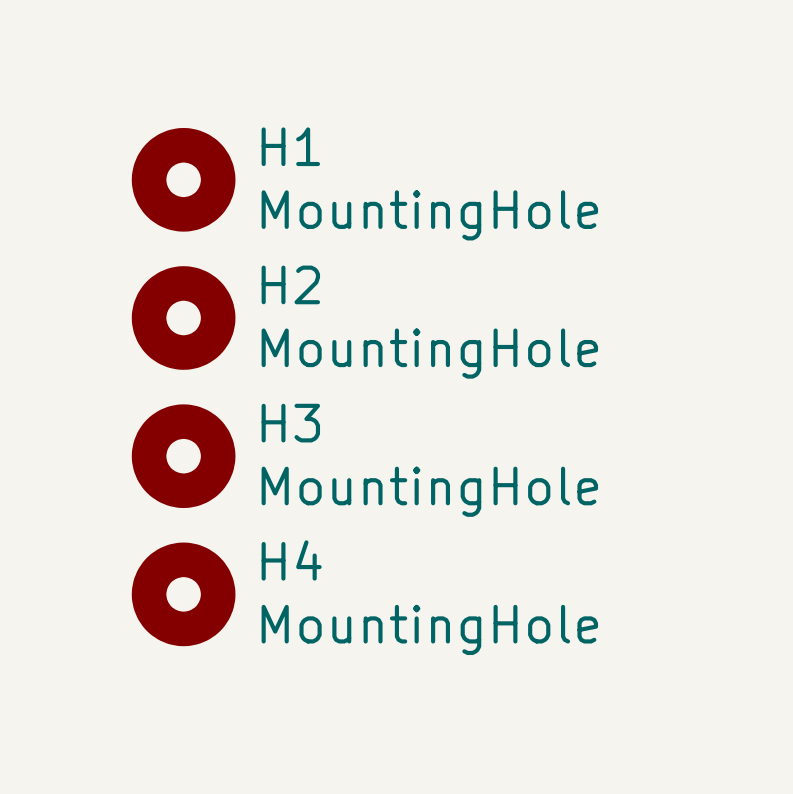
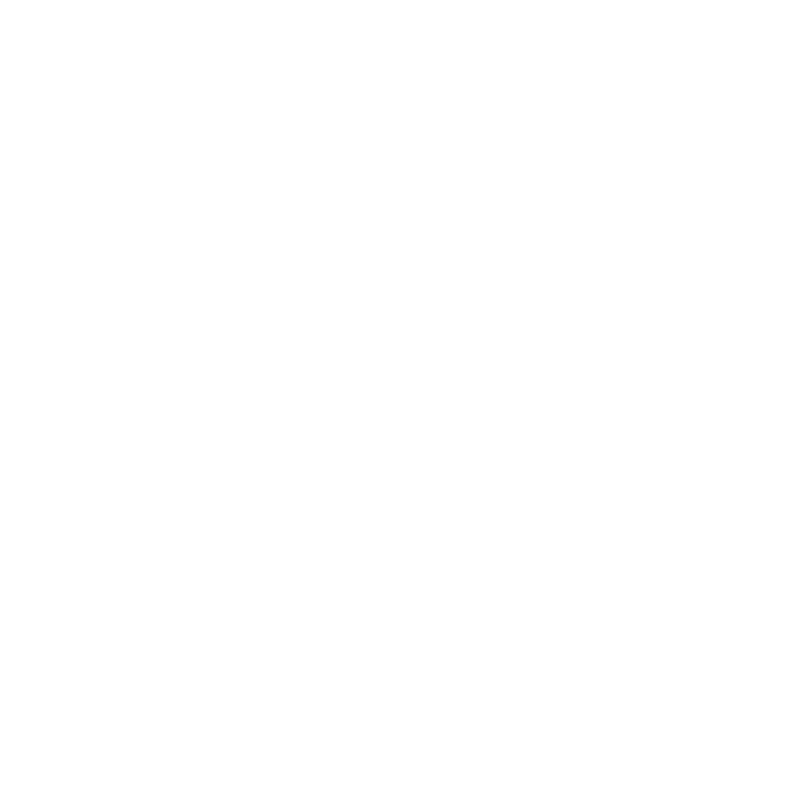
H1: MountingHole (183, 179) -> none
H2: MountingHole (183, 318) -> none
H3: MountingHole (183, 456) -> none
H4: MountingHole (183, 594) -> none

